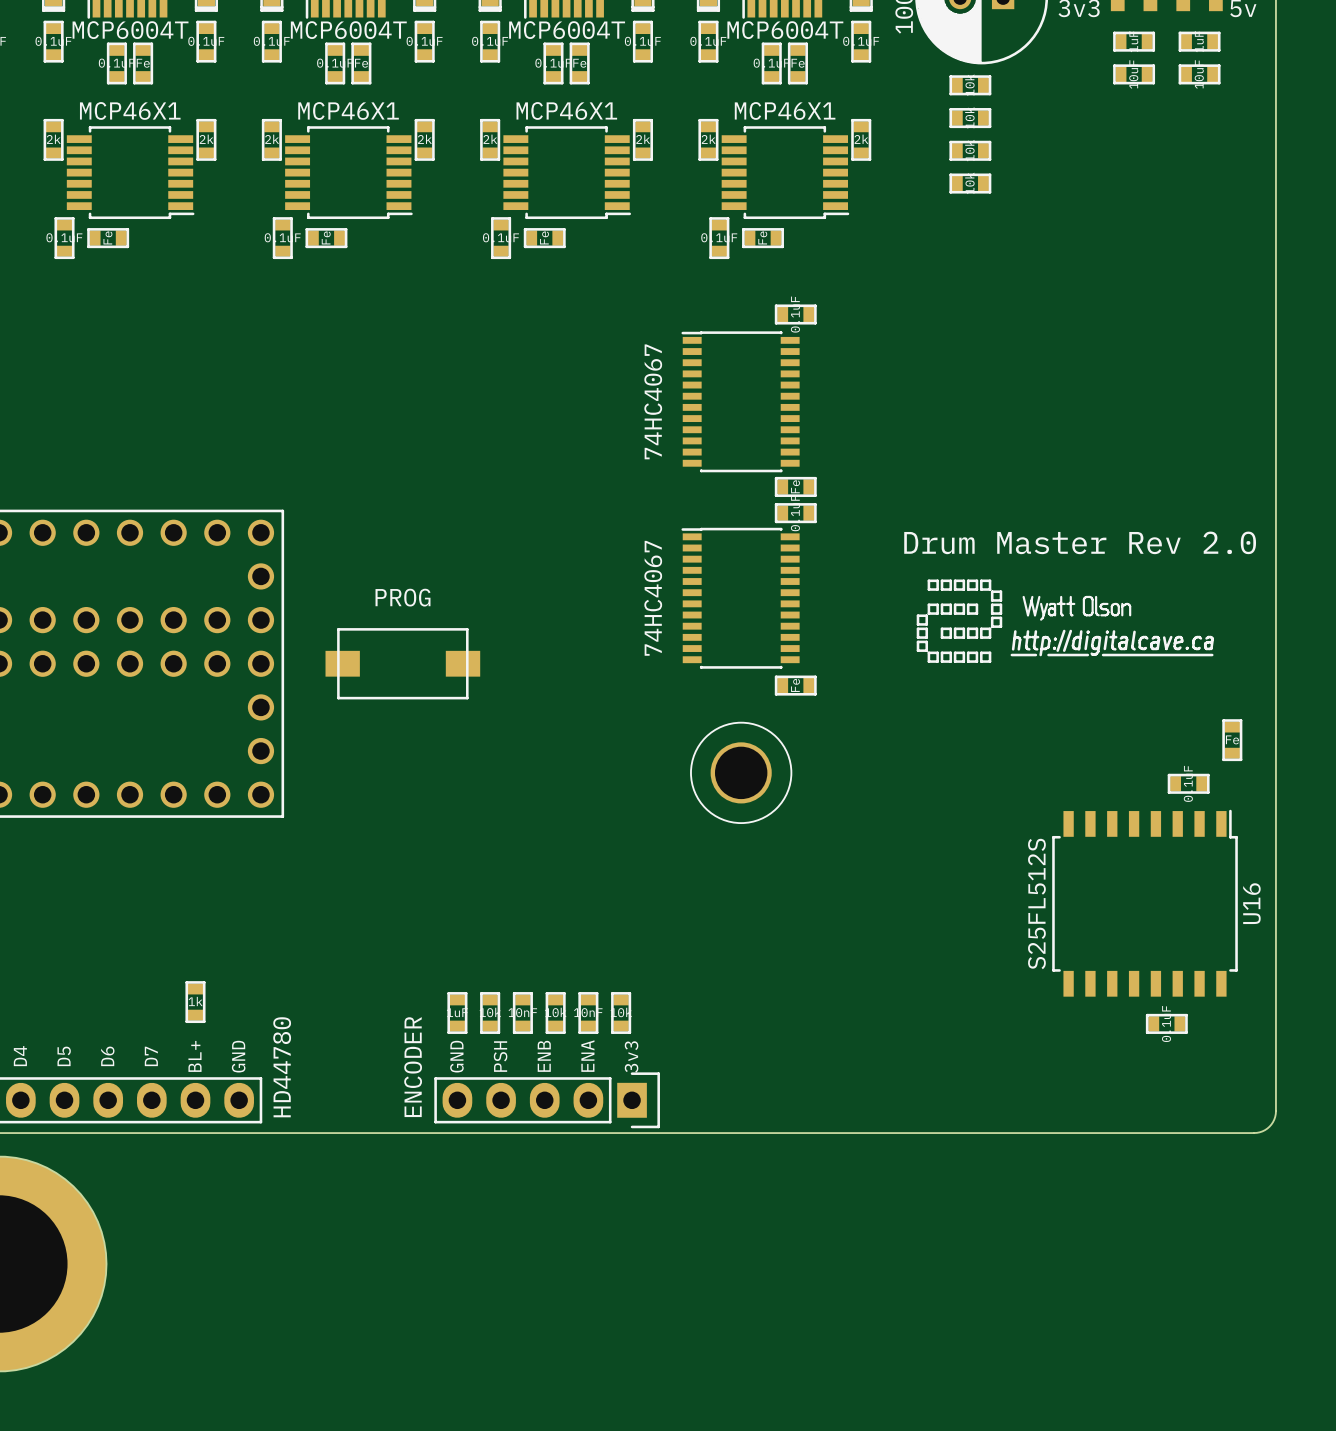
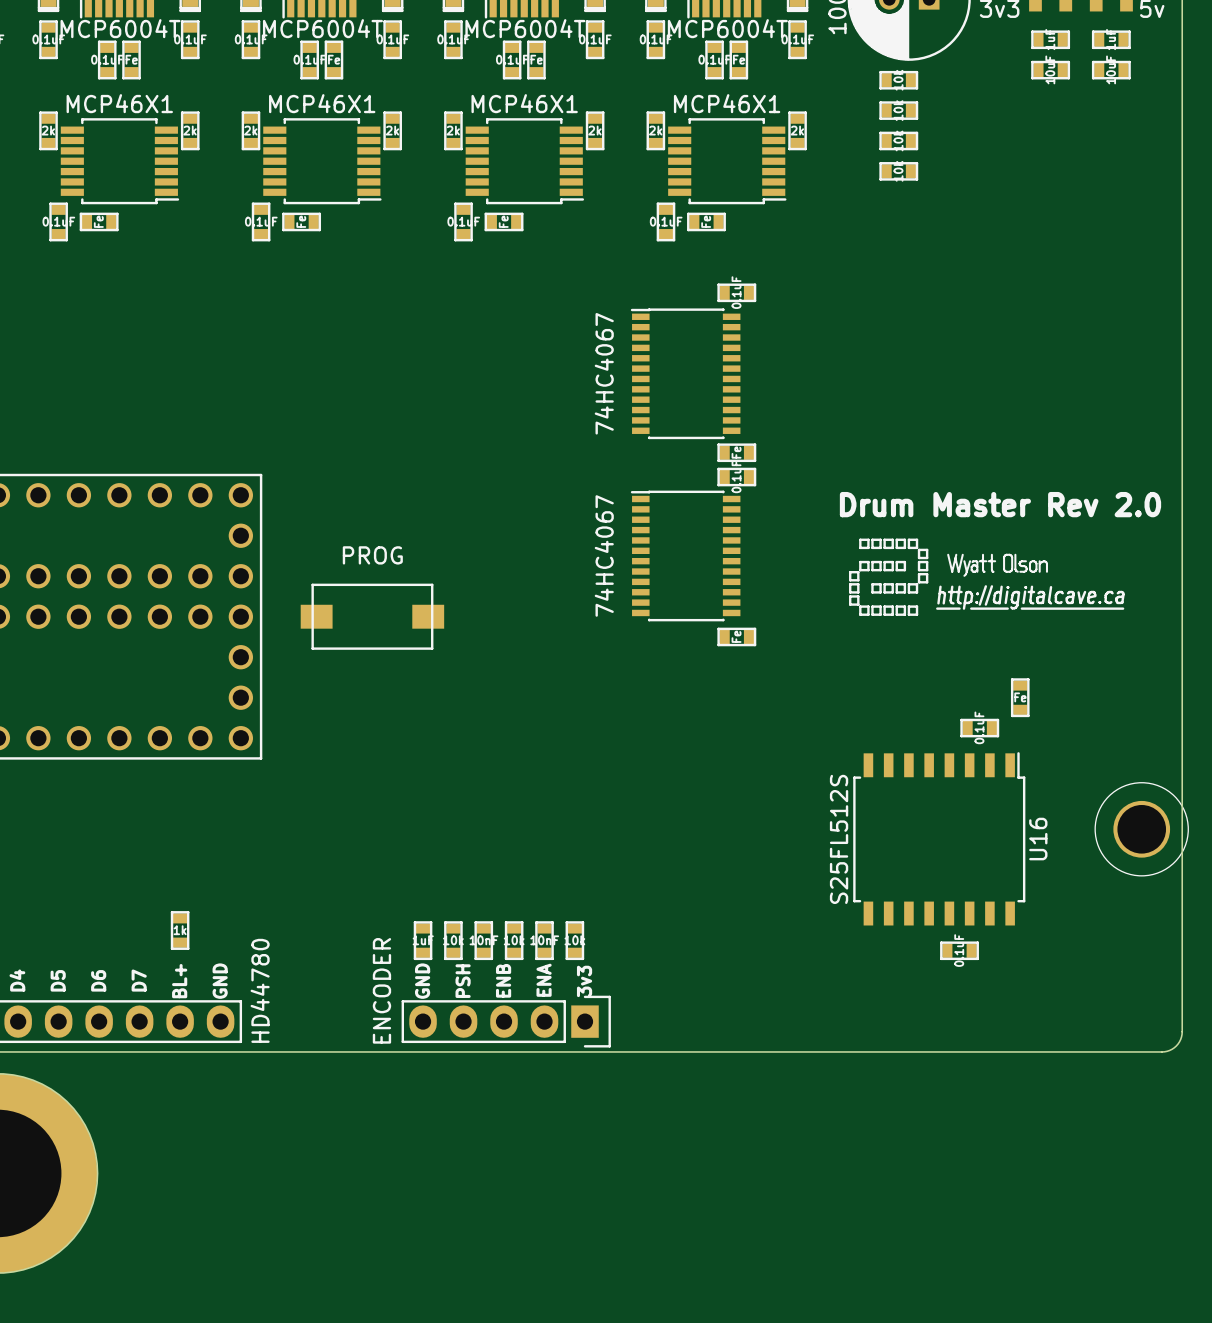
part position: (1232, 740) -> (1020, 697)
part: (741, 772) -> none
part position: (1188, 783) -> (979, 728)
part: none -> (1141, 829)
U16 position: (1145, 903) -> (939, 838)
part position: (1166, 1023) -> (959, 950)

